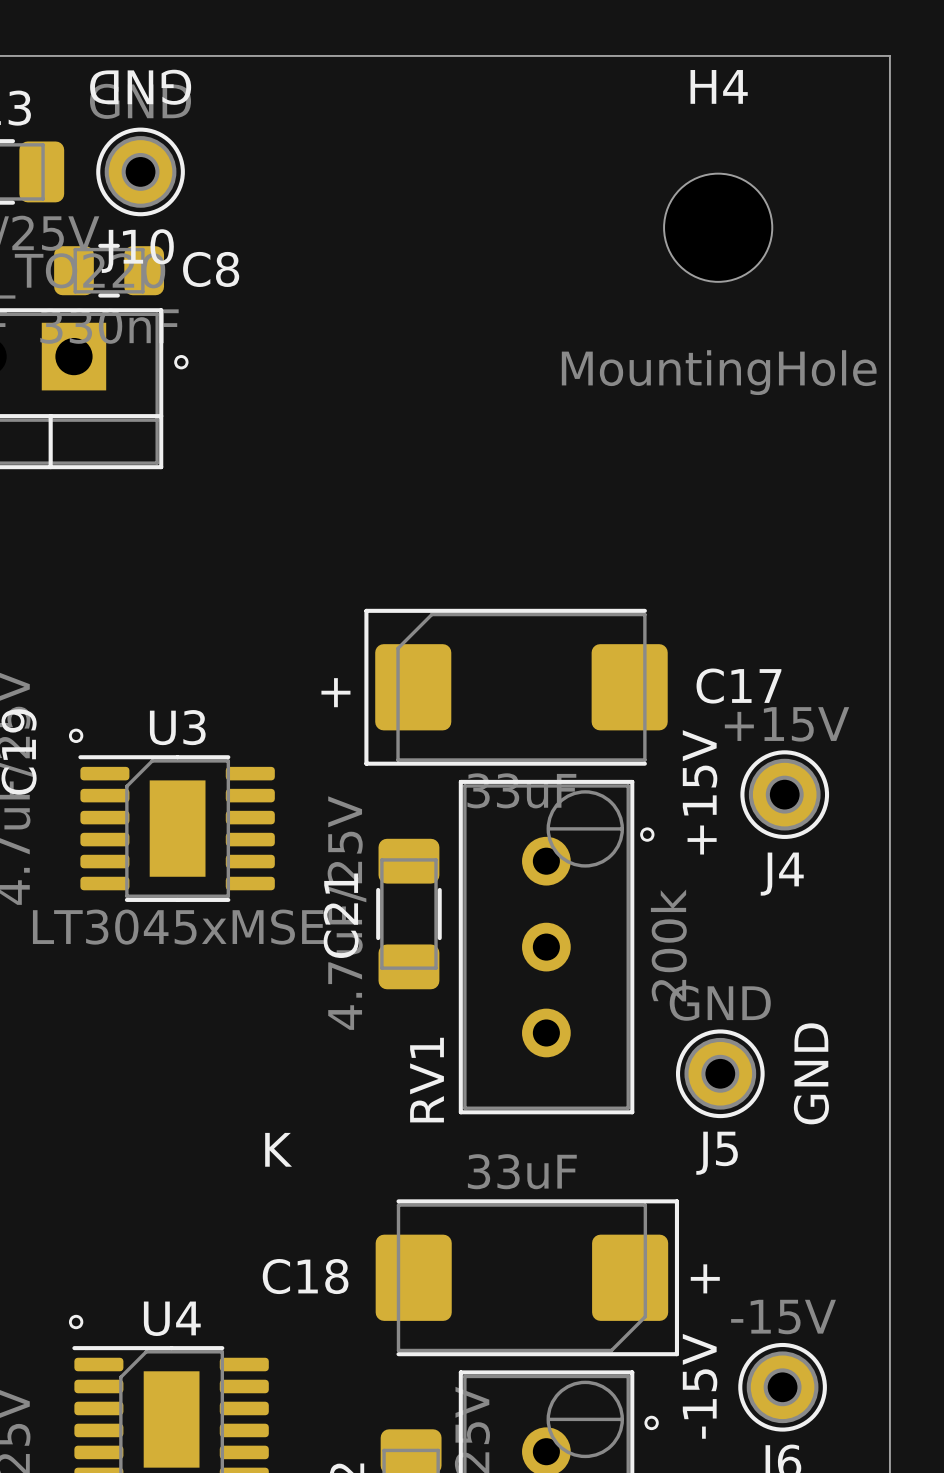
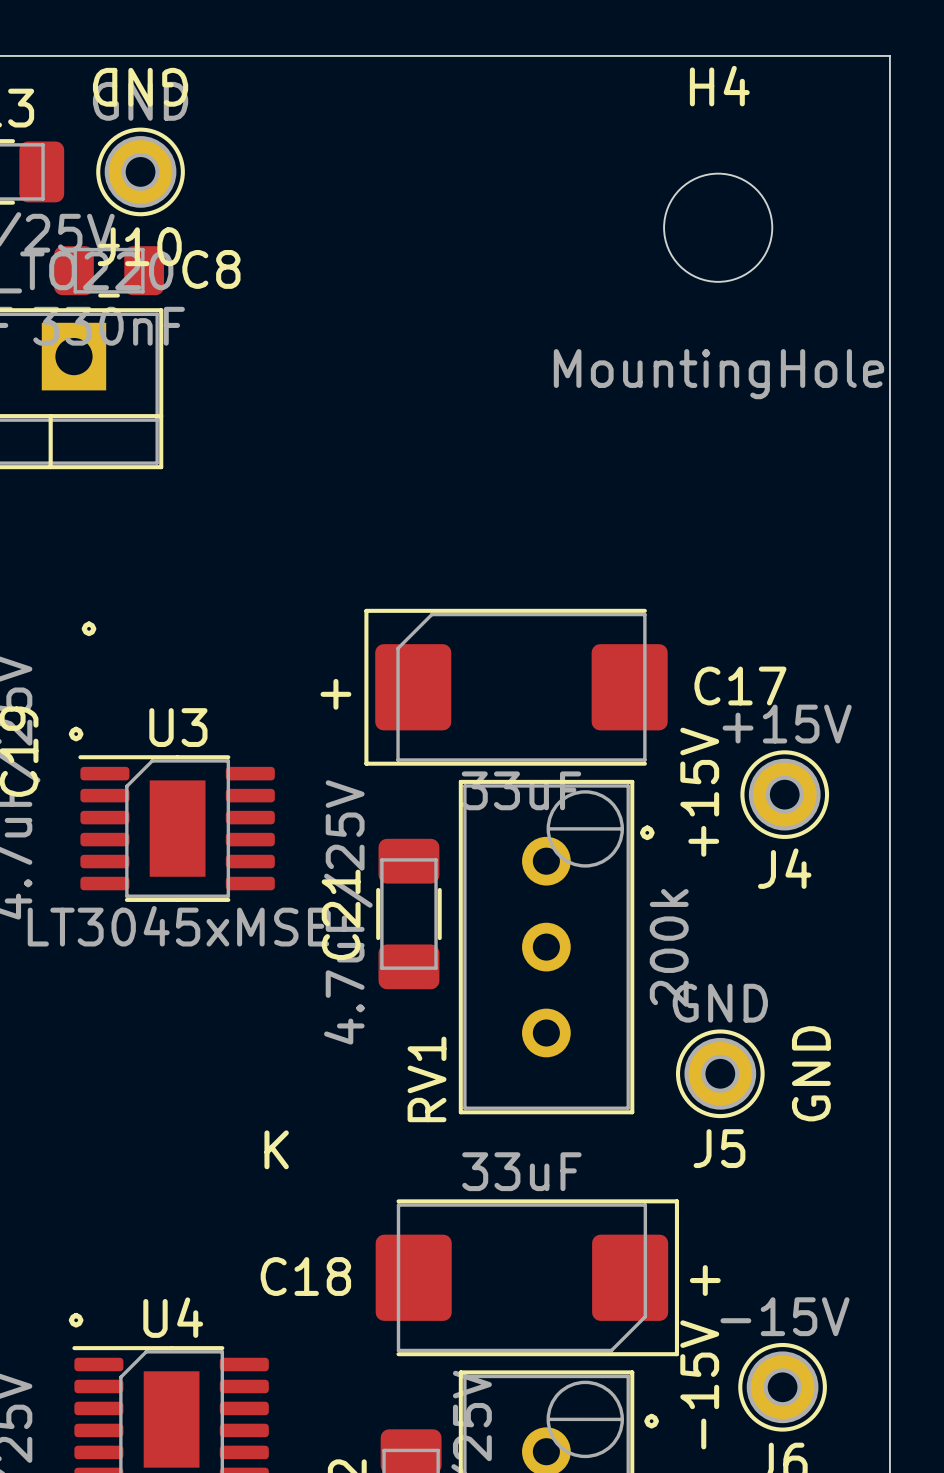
text position: ° (181, 362) -> ° (89, 628)

